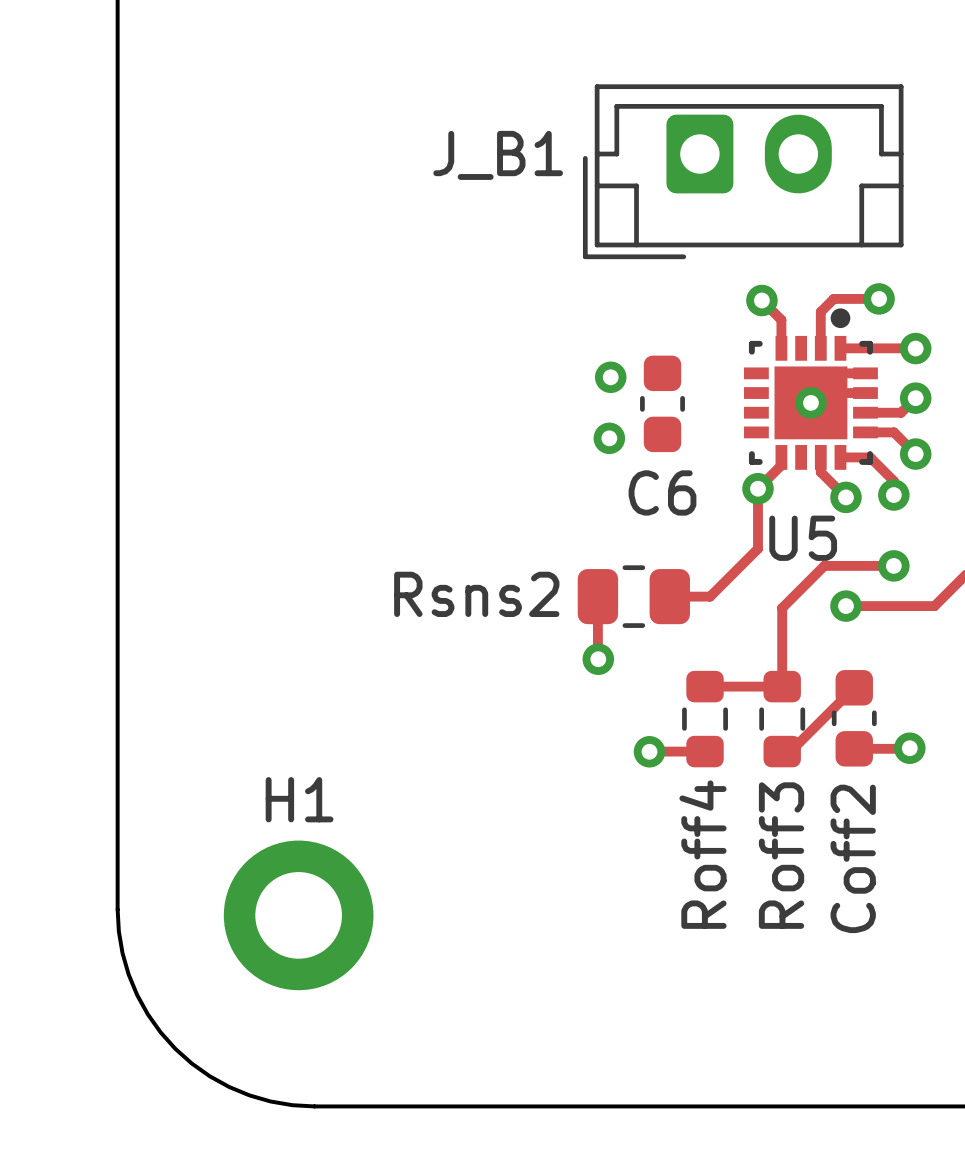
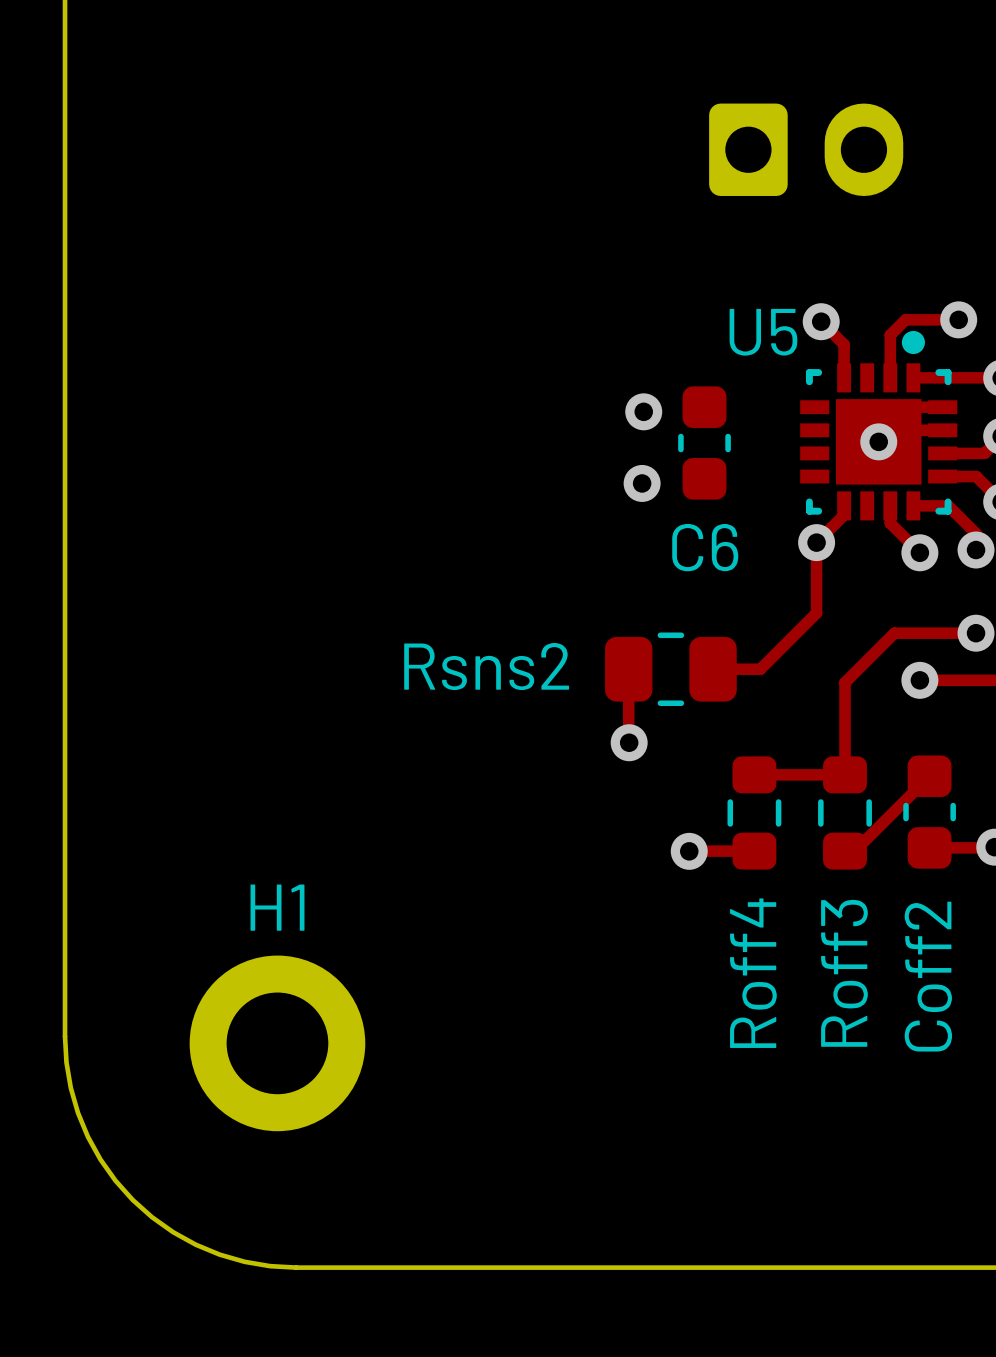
J_B1 side: top (743, 171) -> bottom (806, 149)
U5 name position: U5 (803, 538) -> U5 (763, 332)

